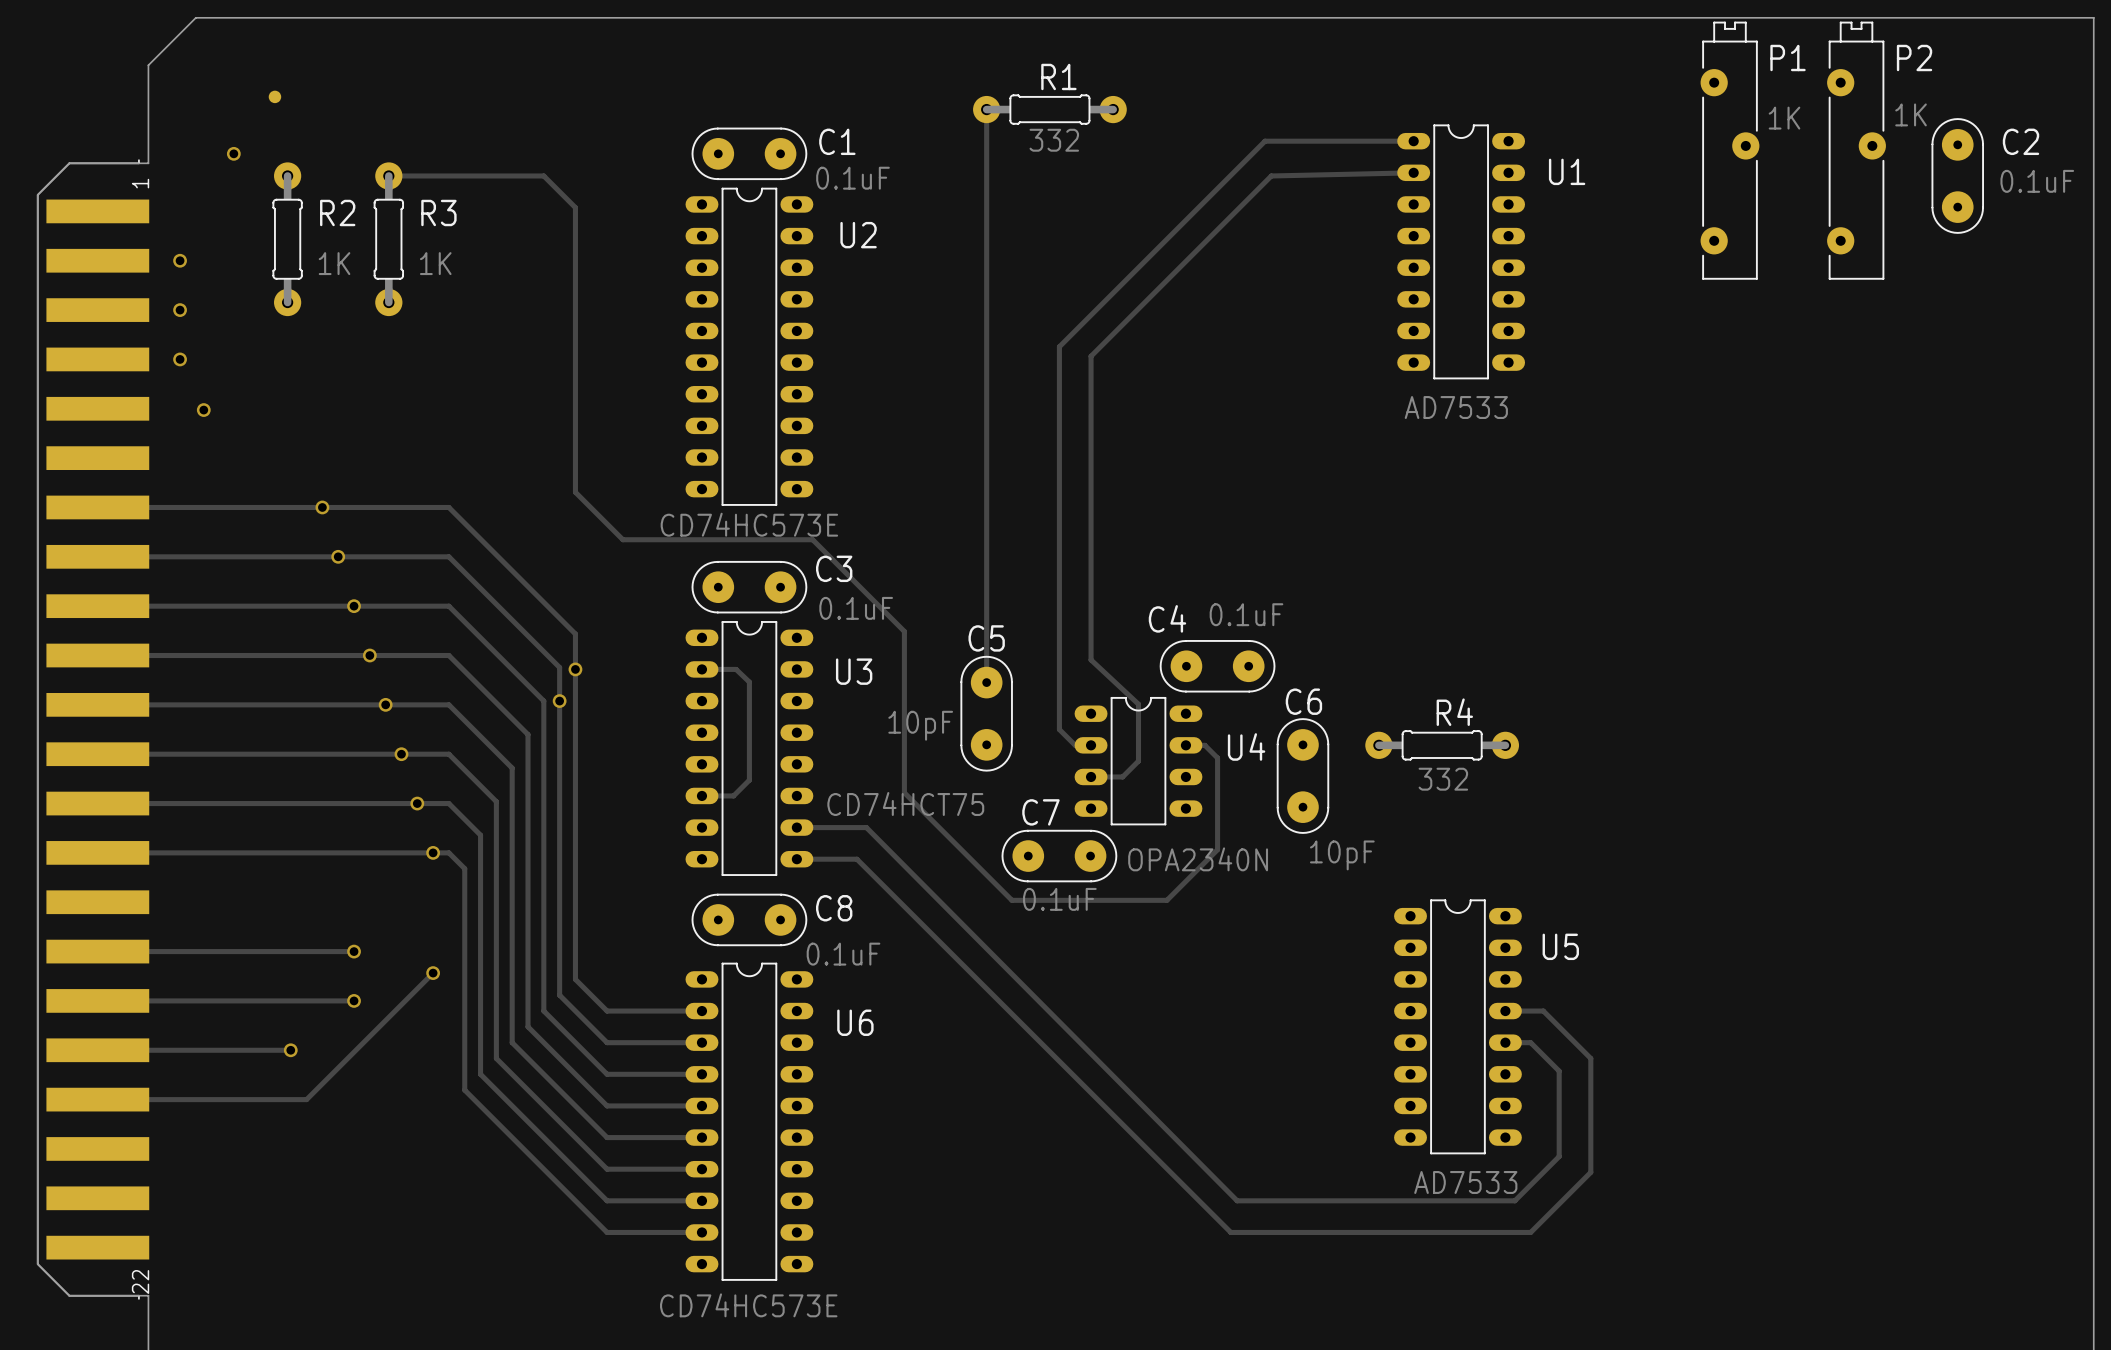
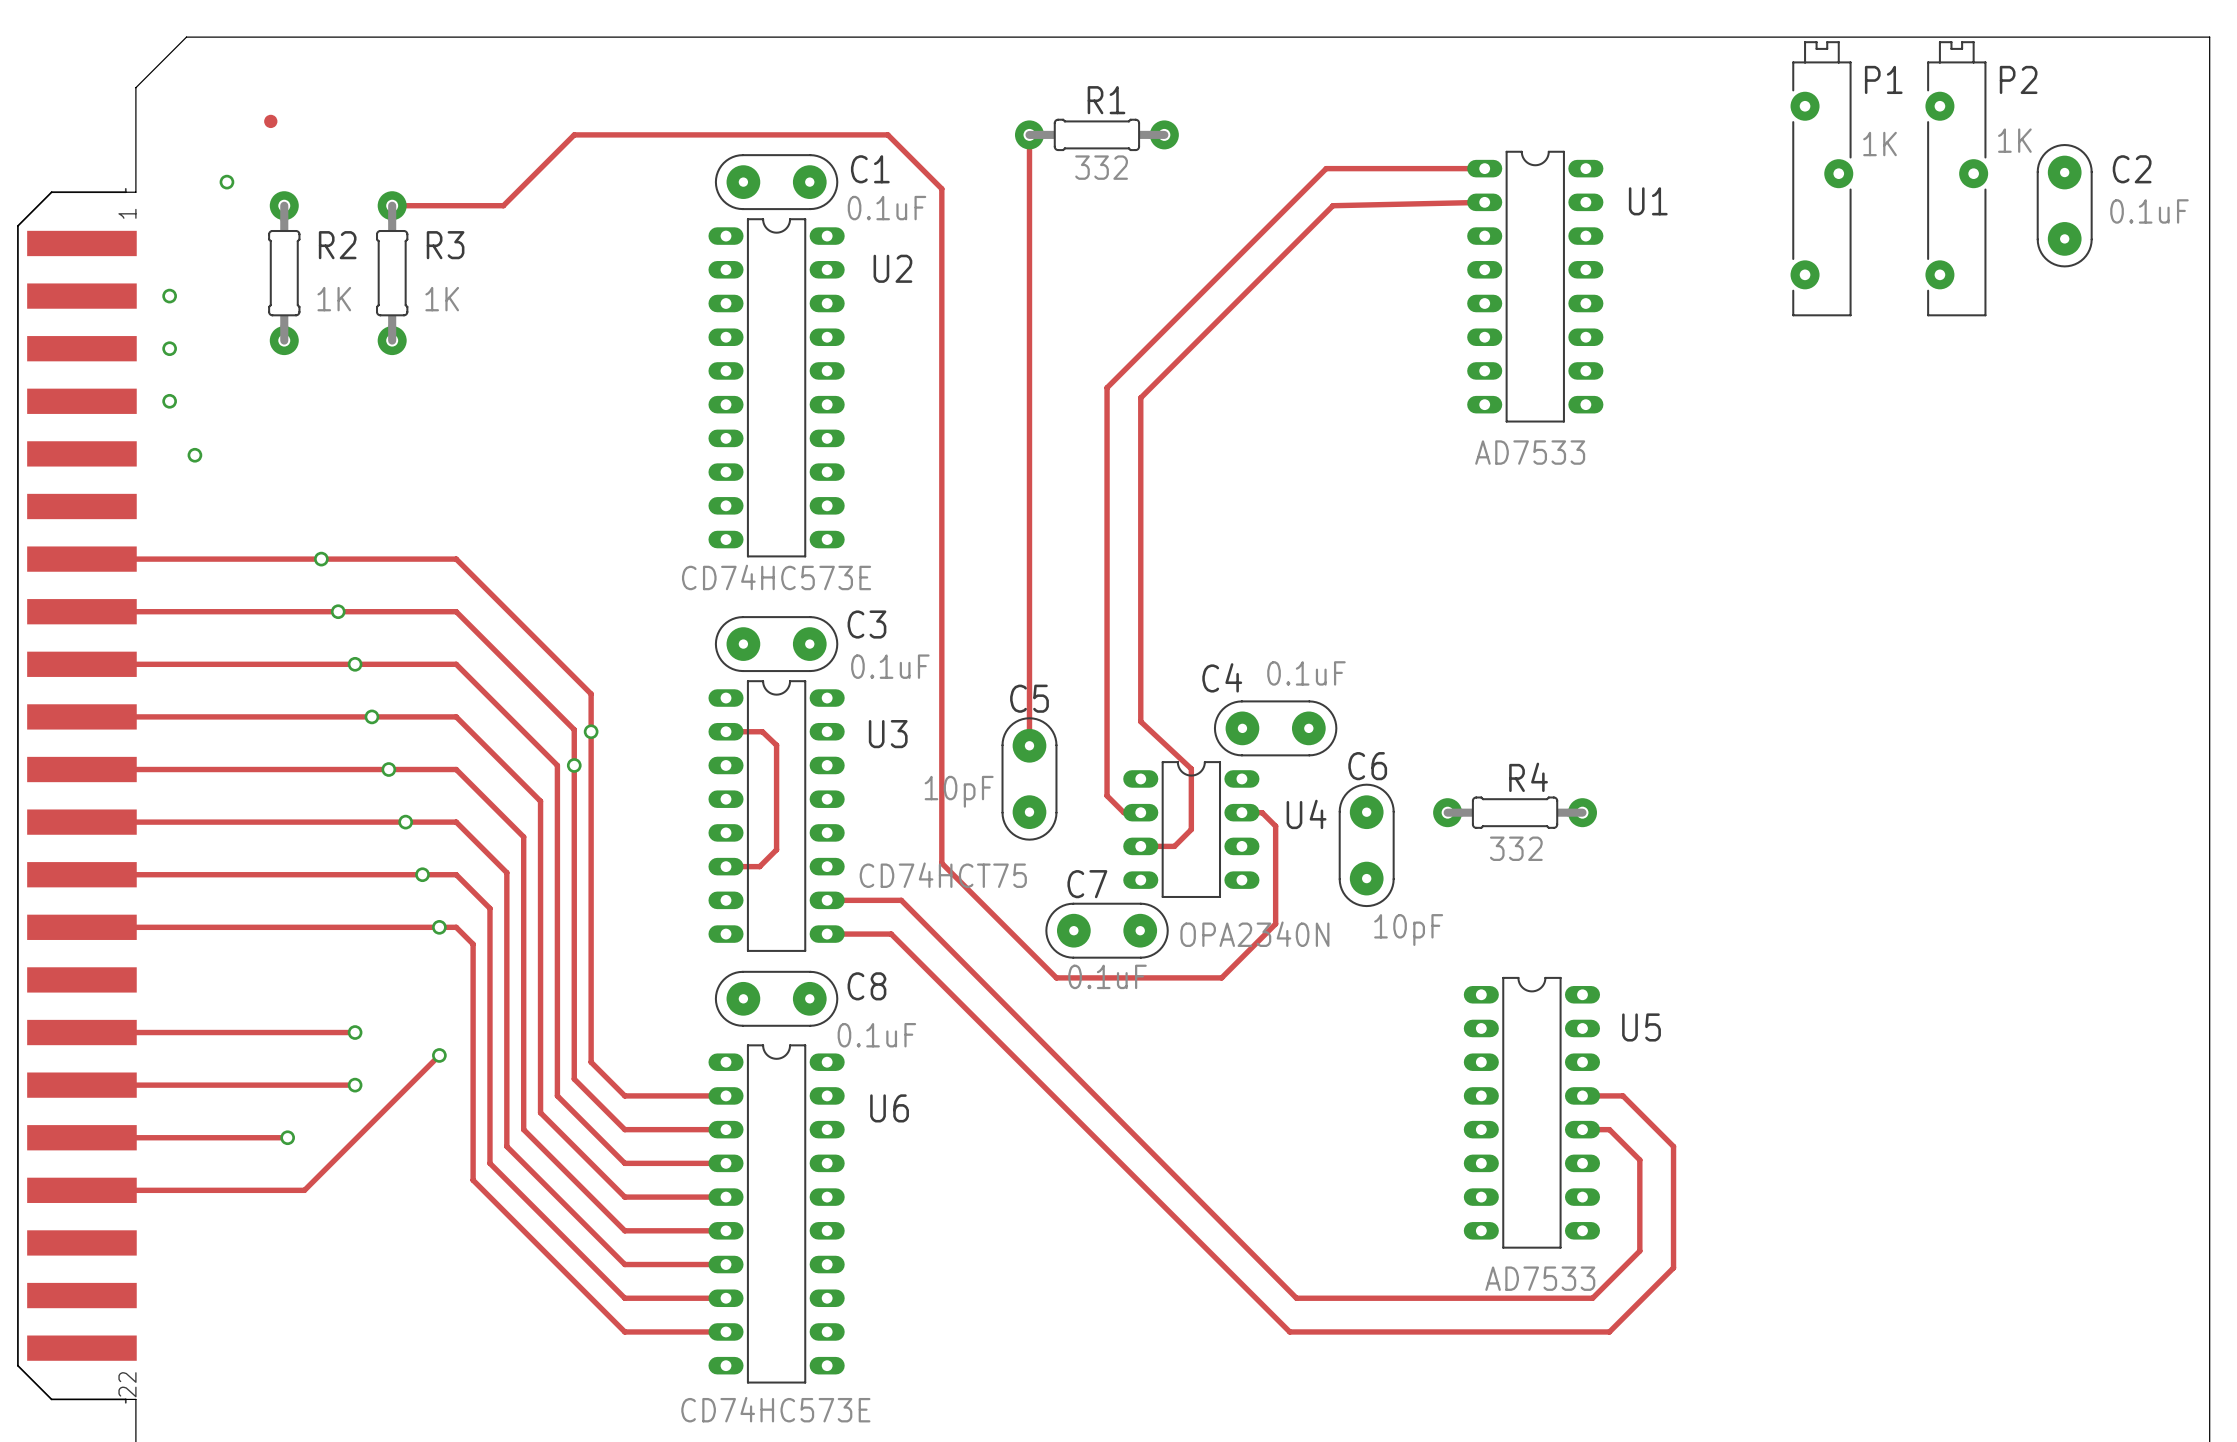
track: (493, 175) (543, 175) (575, 207) (575, 492) (622, 539) (812, 539) (904, 631) -> (503, 205) (574, 134) (887, 134) (941, 188) (941, 691)

